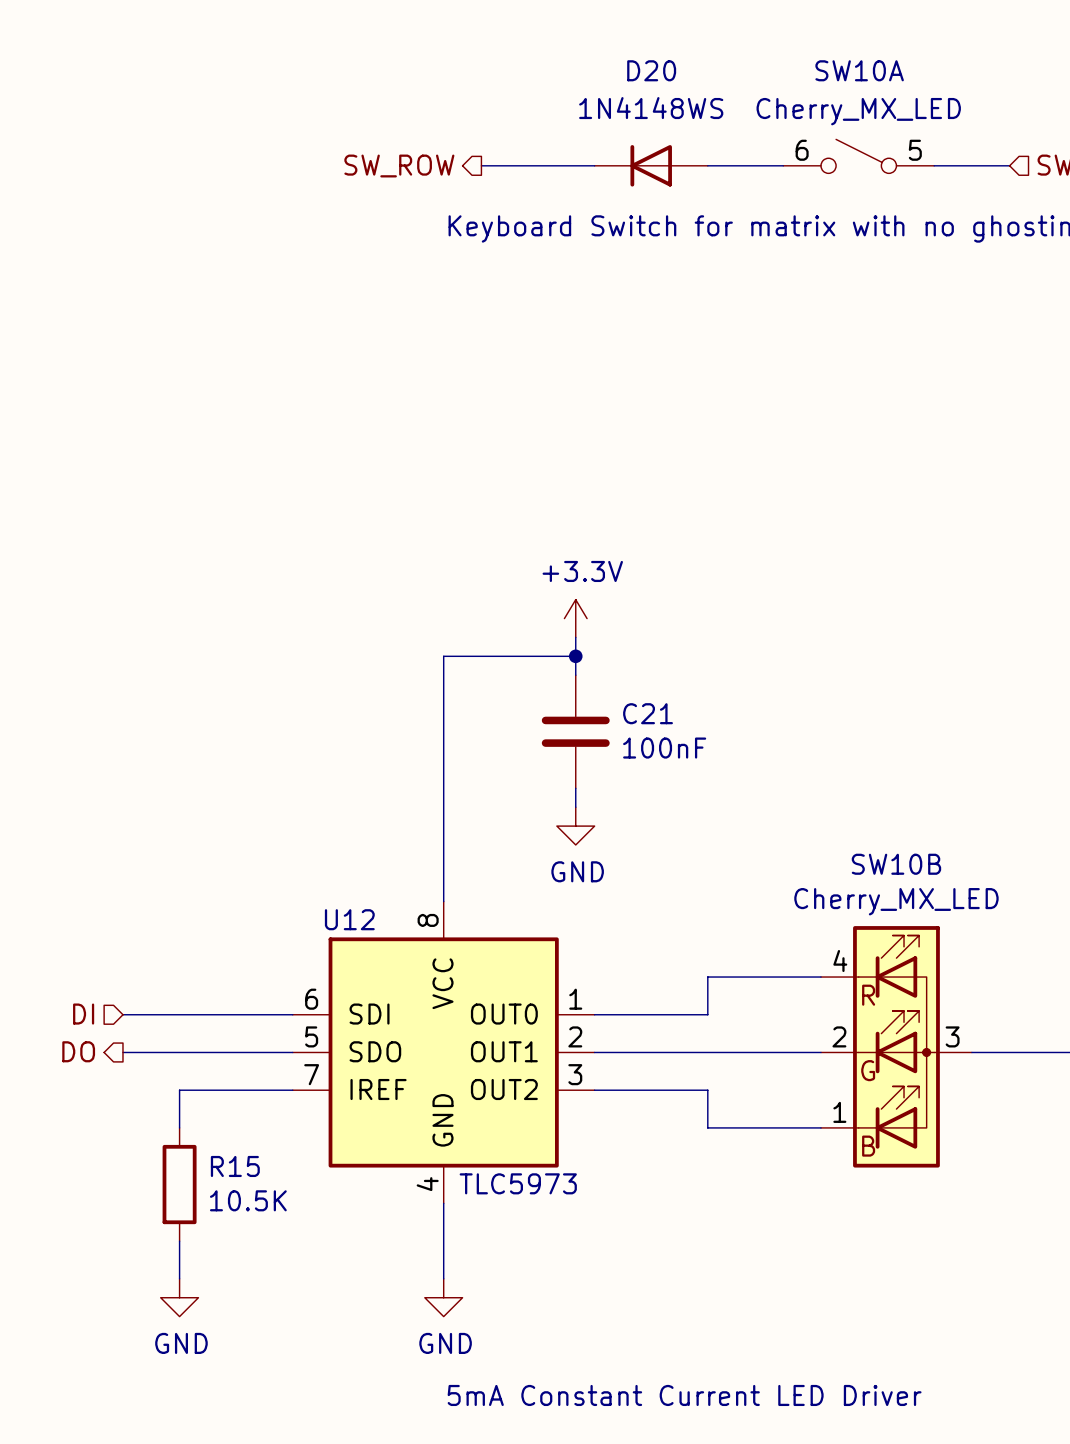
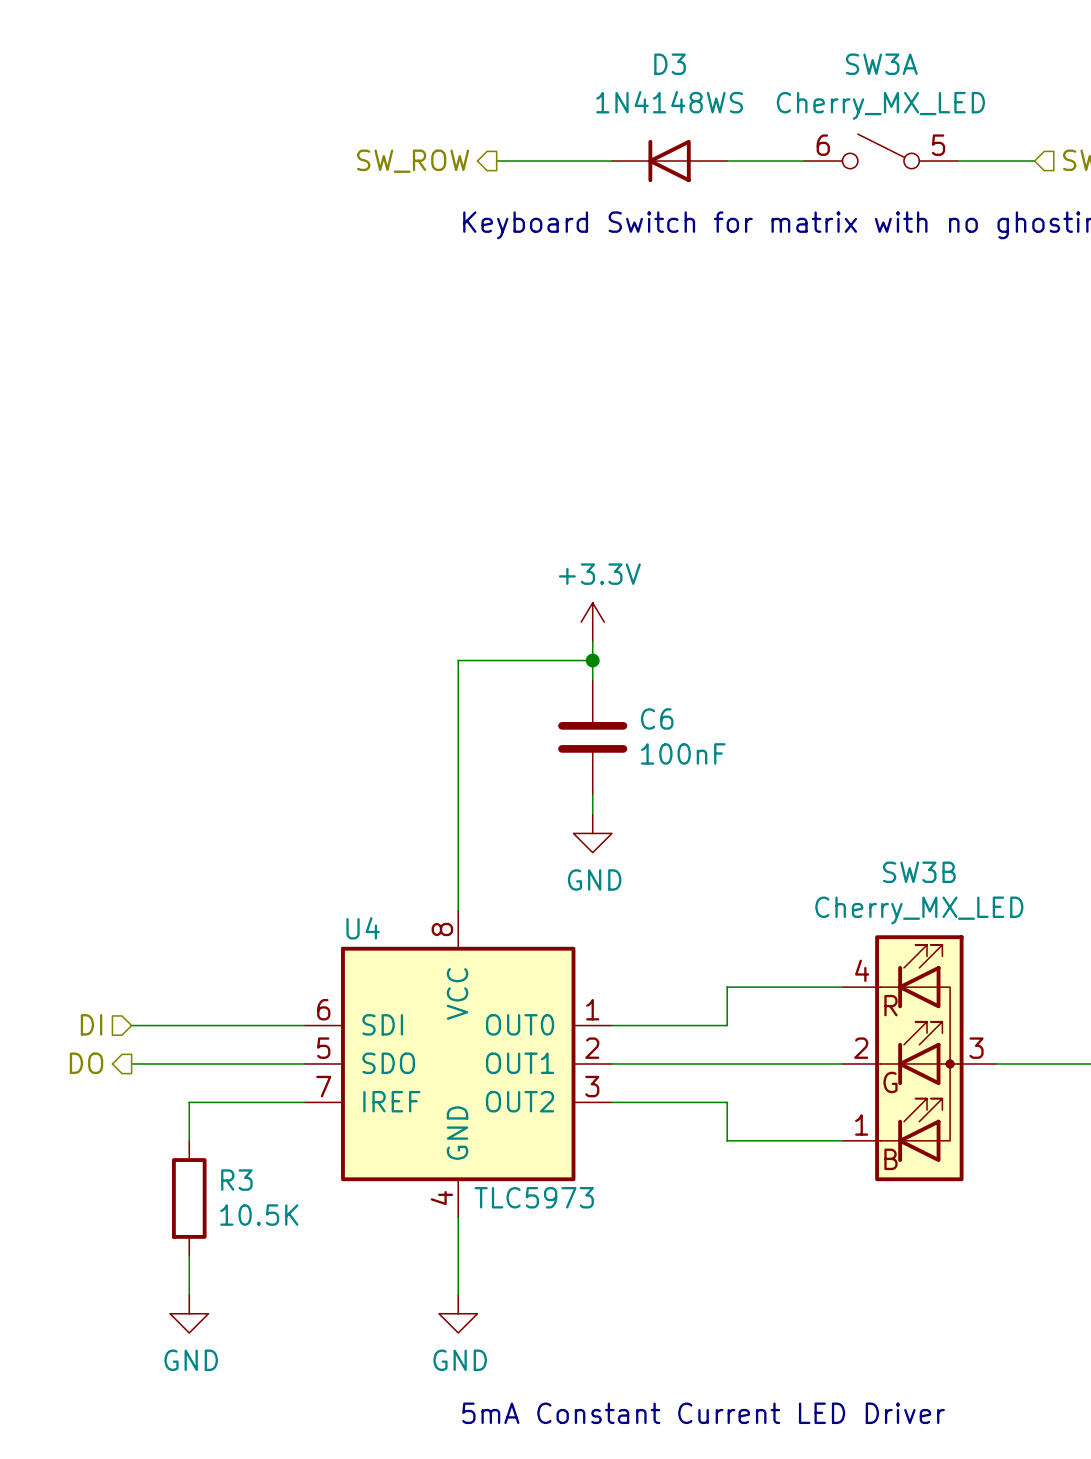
D20 name: D20 (651, 70) -> D3 (670, 64)
SW10A name: SW10A (859, 70) -> SW3A (881, 64)
C21 name: C21 (648, 713) -> C6 (657, 718)
SW10B name: SW10B (896, 864) -> SW3B (919, 872)
U12 name: U12 (349, 919) -> U4 (363, 928)
R15 name: R15 (235, 1166) -> R3 (236, 1180)

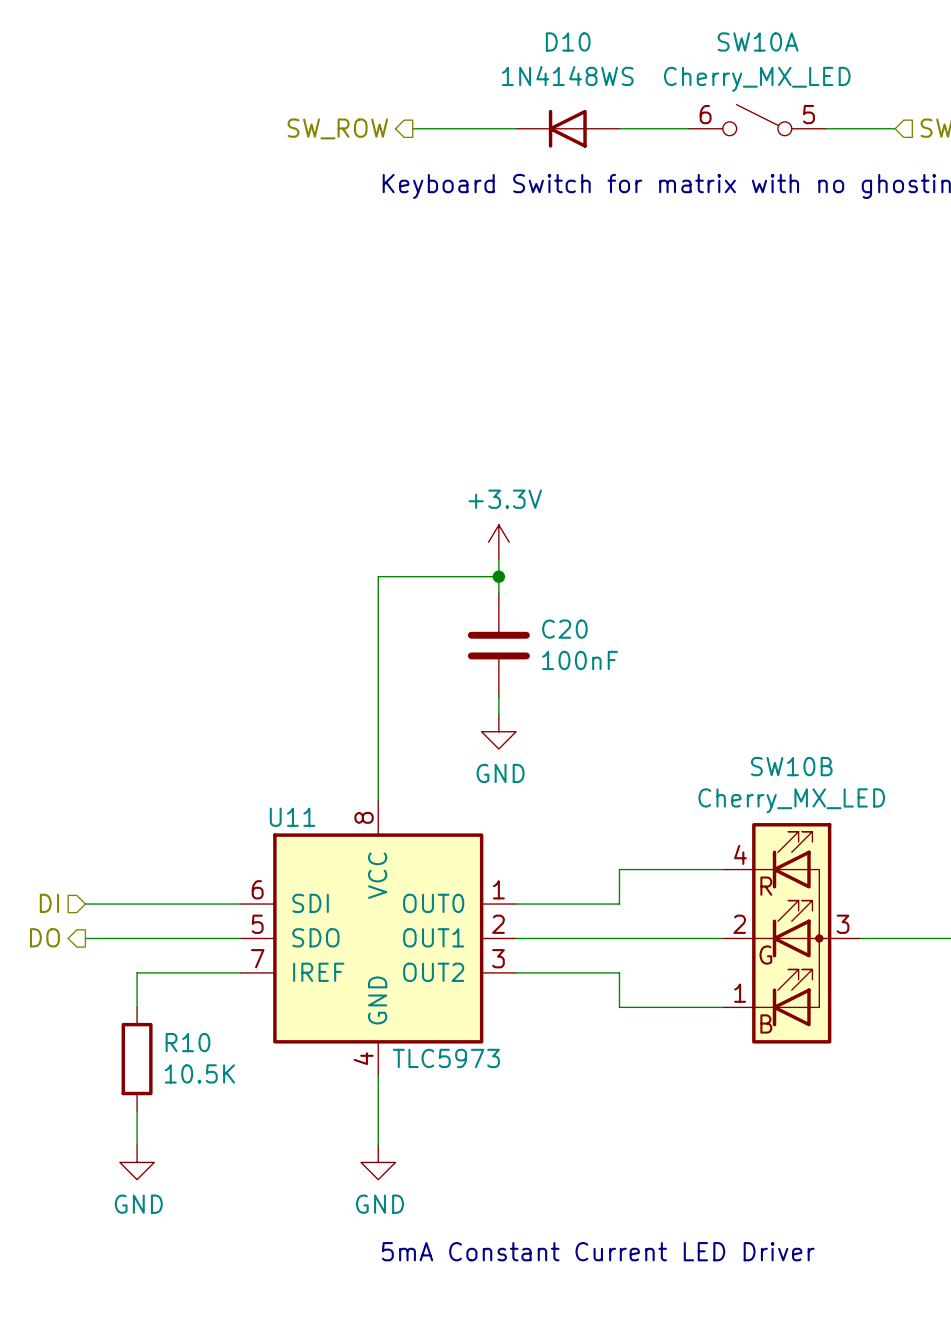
D3 name: D3 (670, 64) -> D10 (568, 41)
SW3A name: SW3A (881, 64) -> SW10A (758, 41)
C6 name: C6 (657, 718) -> C20 (564, 629)
SW3B name: SW3B (919, 872) -> SW10B (791, 766)
U4 name: U4 (363, 928) -> U11 (292, 817)
R3 name: R3 (236, 1180) -> R10 (187, 1042)

